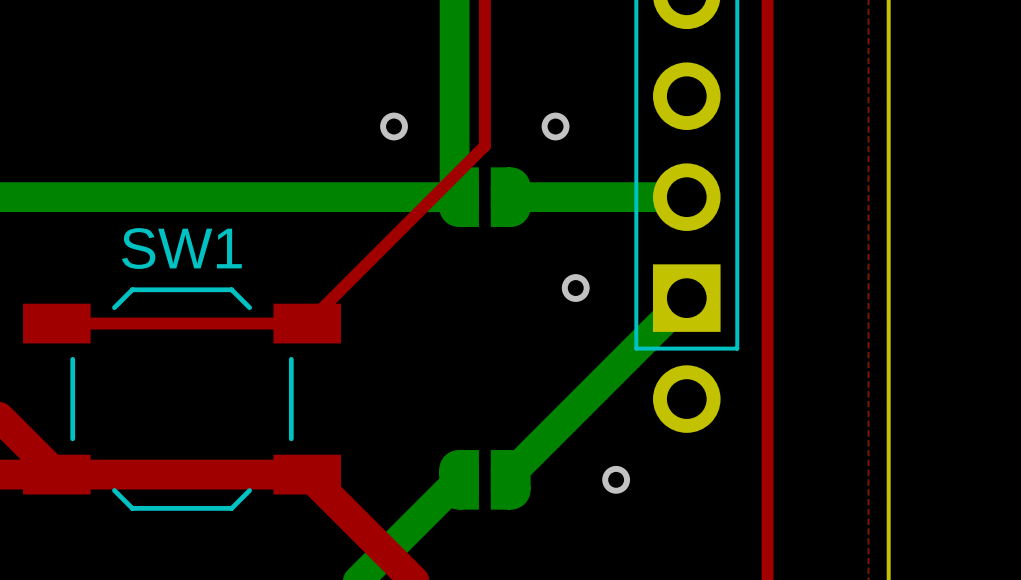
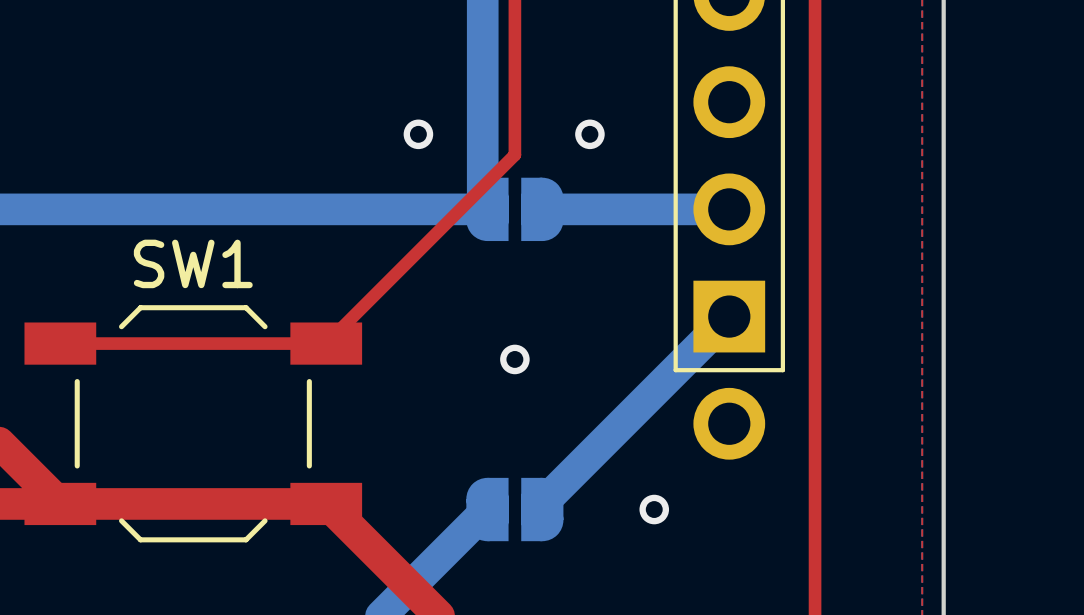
via position: (575, 288) -> (514, 359)

